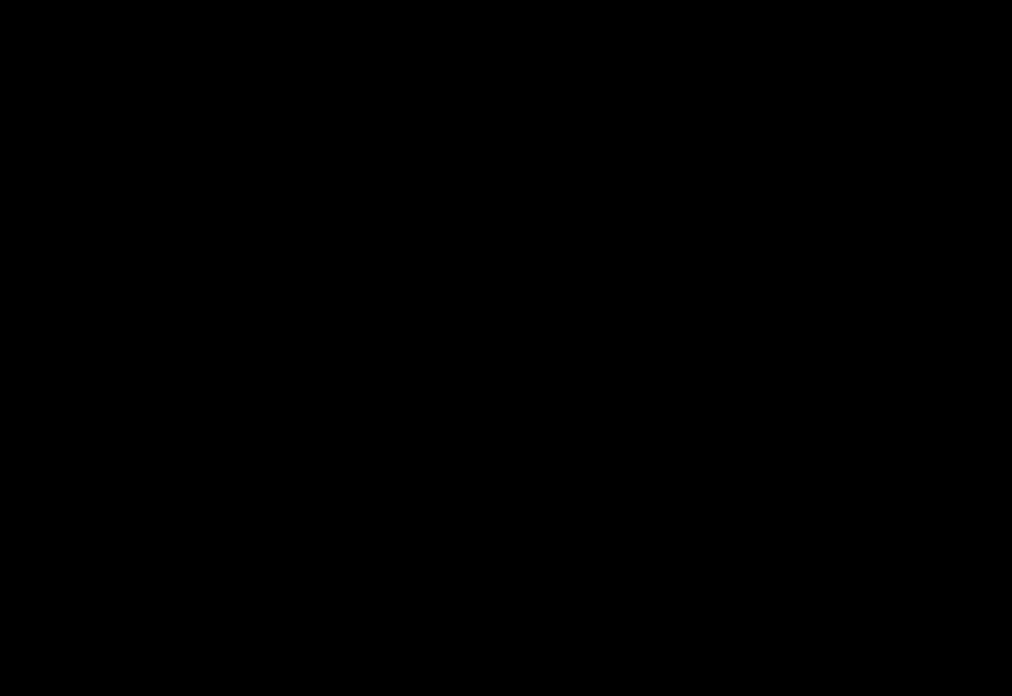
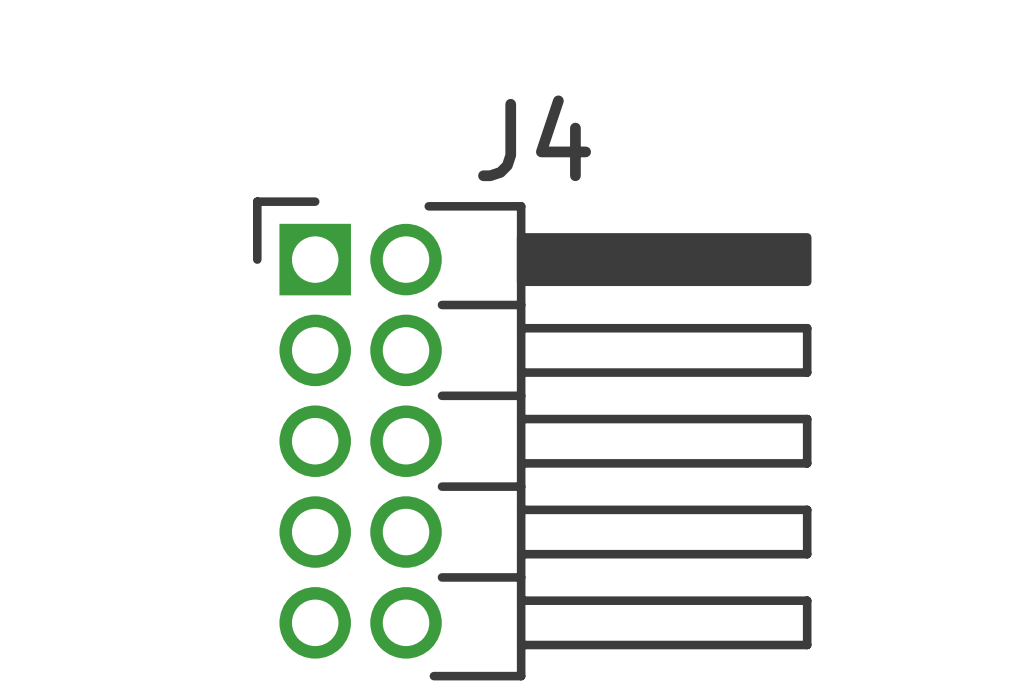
J4: none -> (532, 438)

